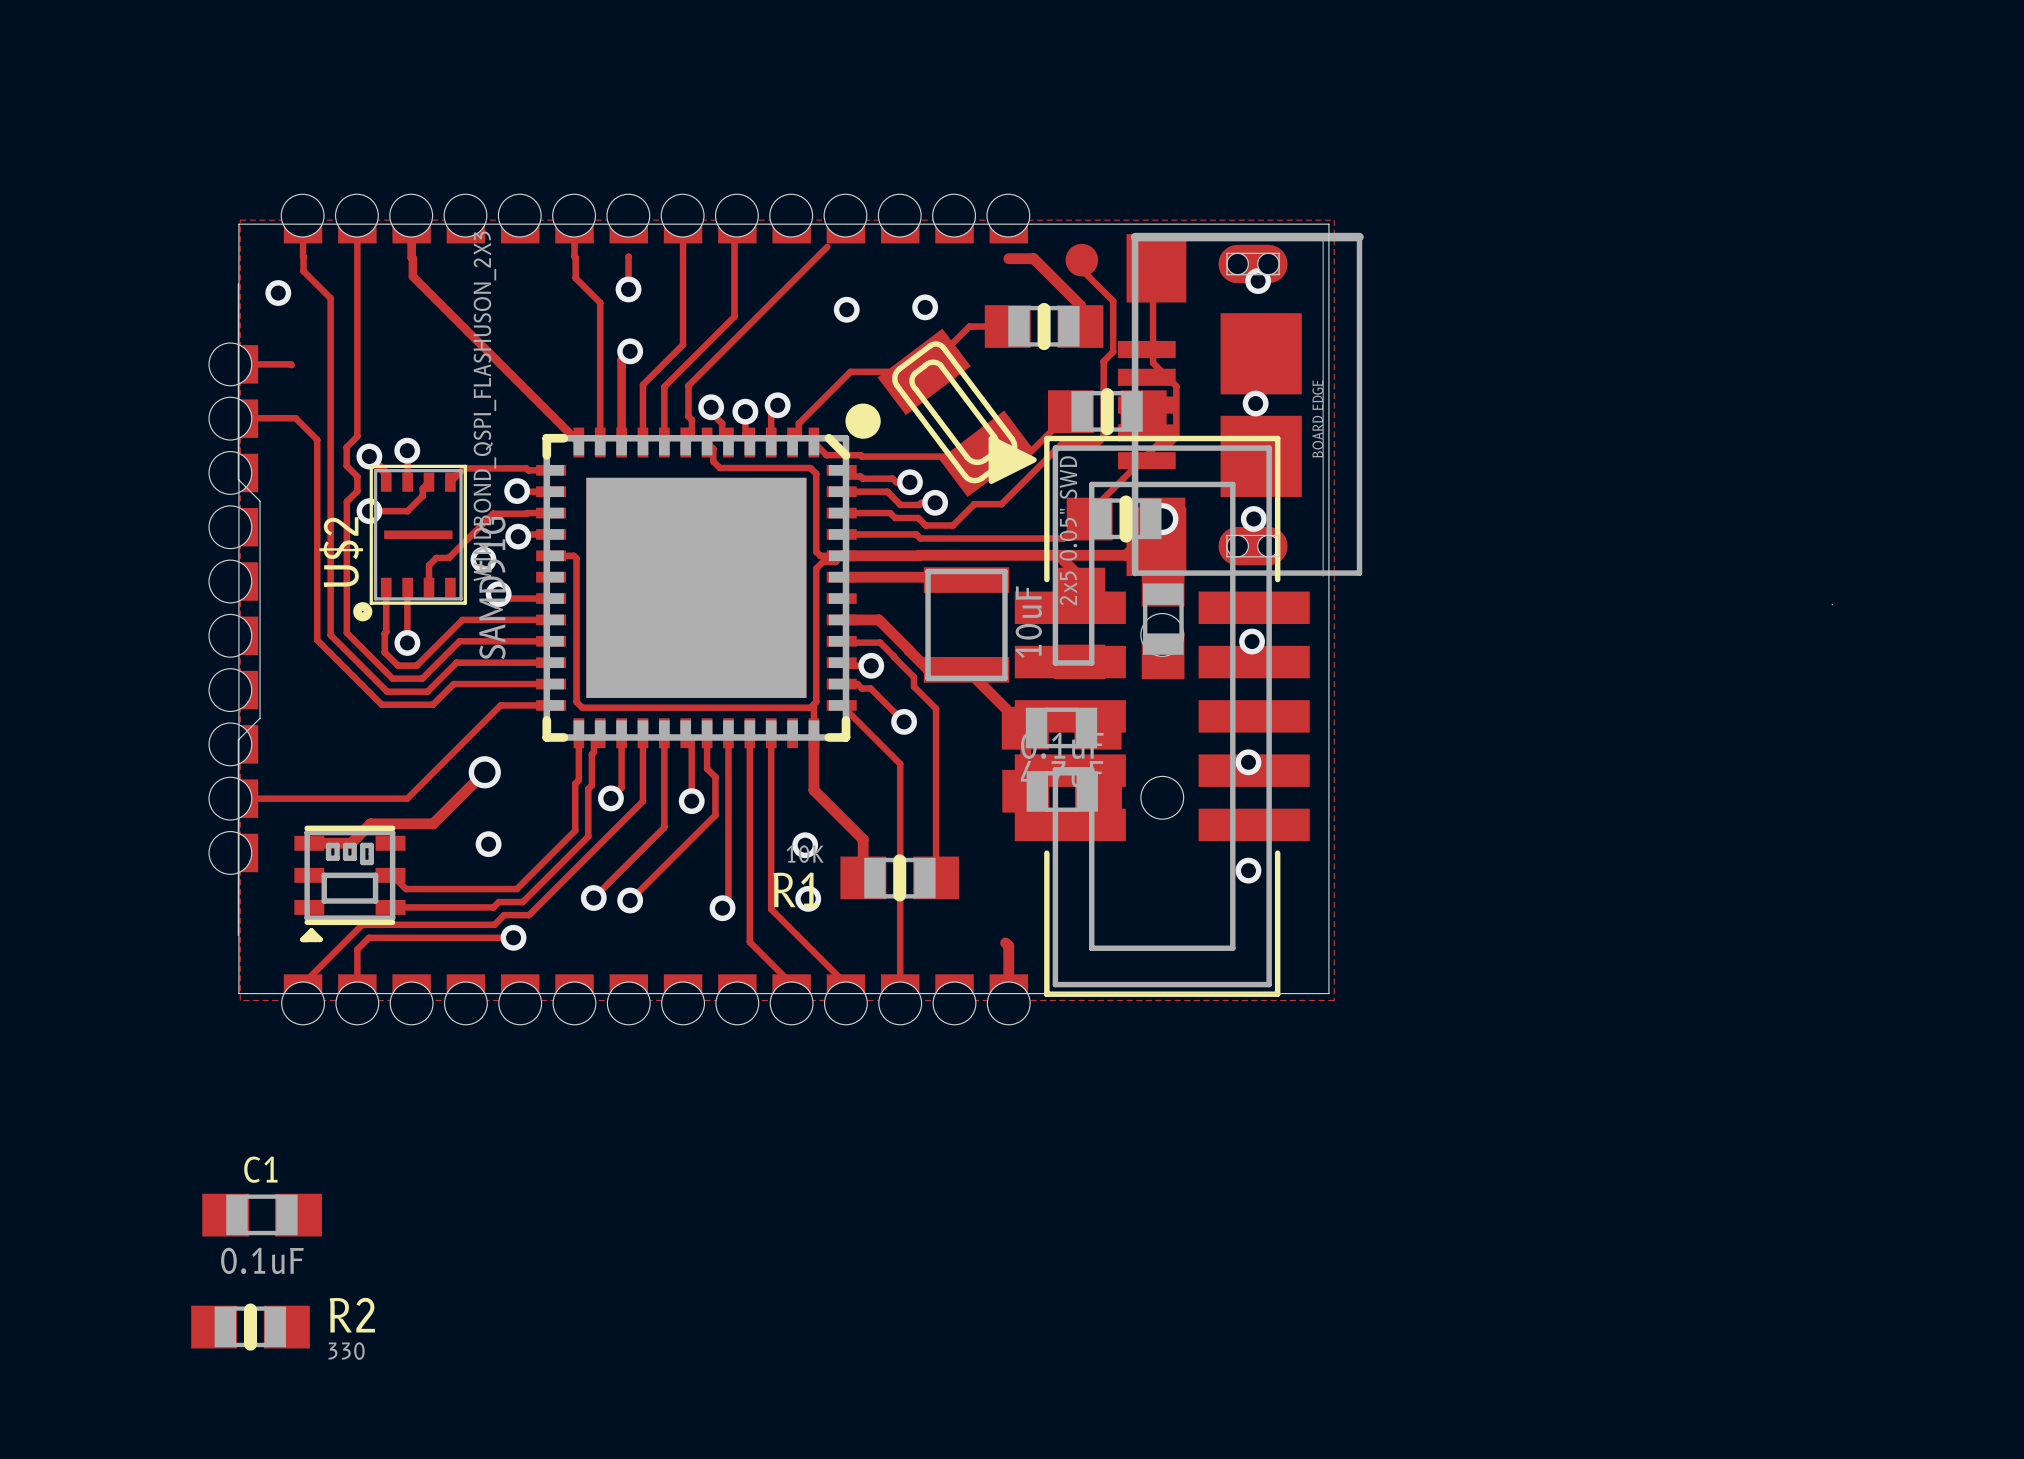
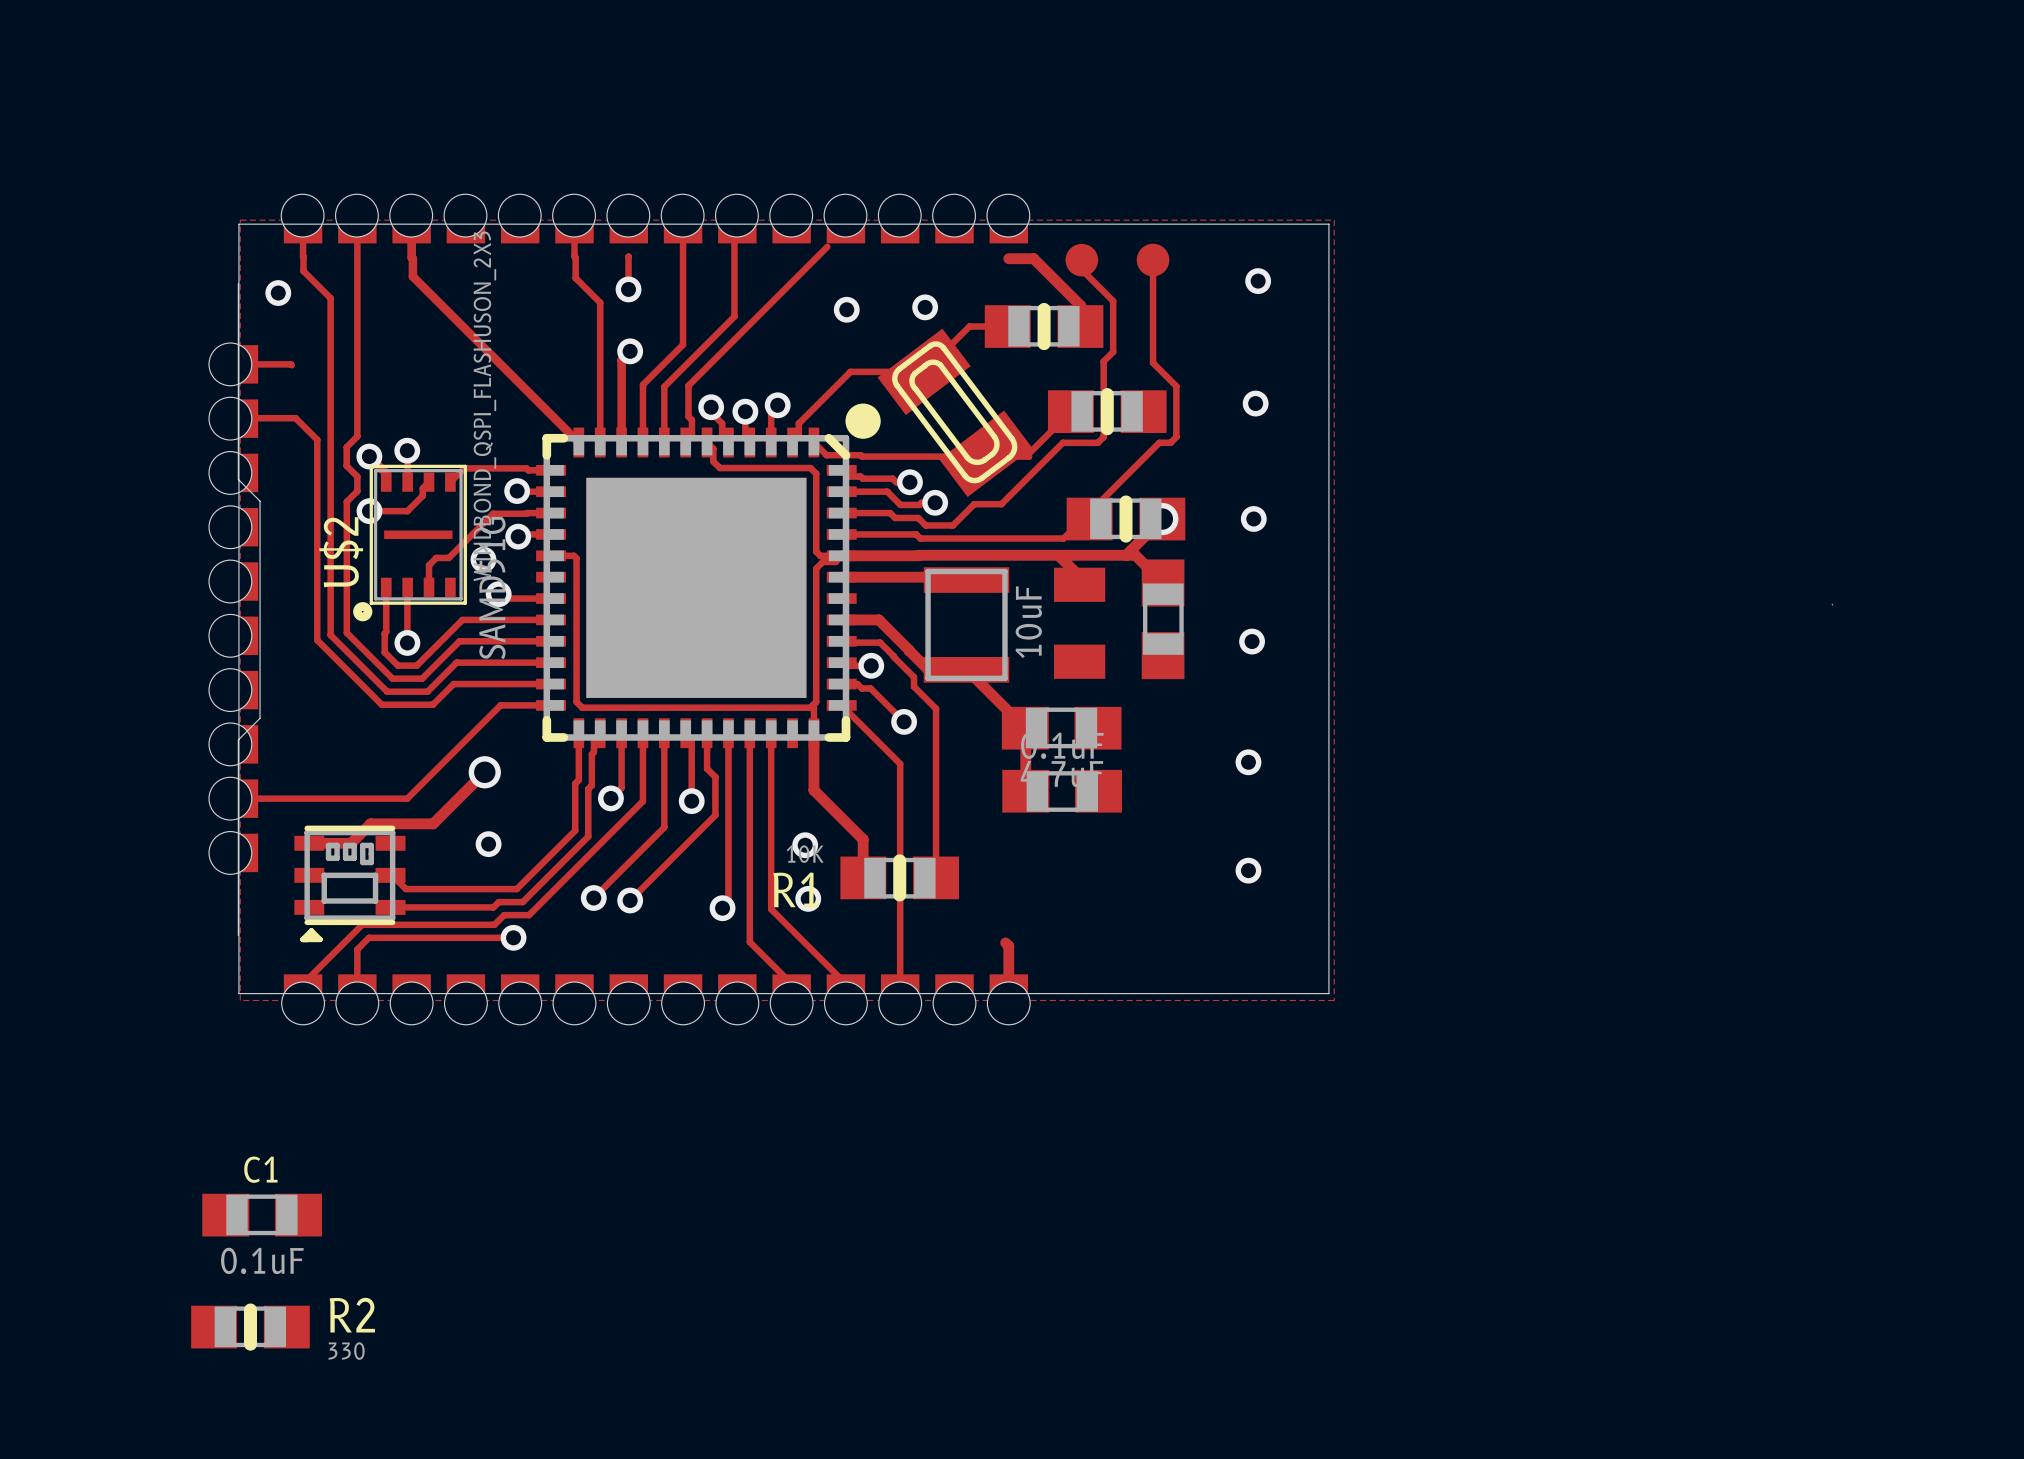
part: (1240, 404) -> none
part: 2x5 0.05" SWD (1149, 716) -> none

